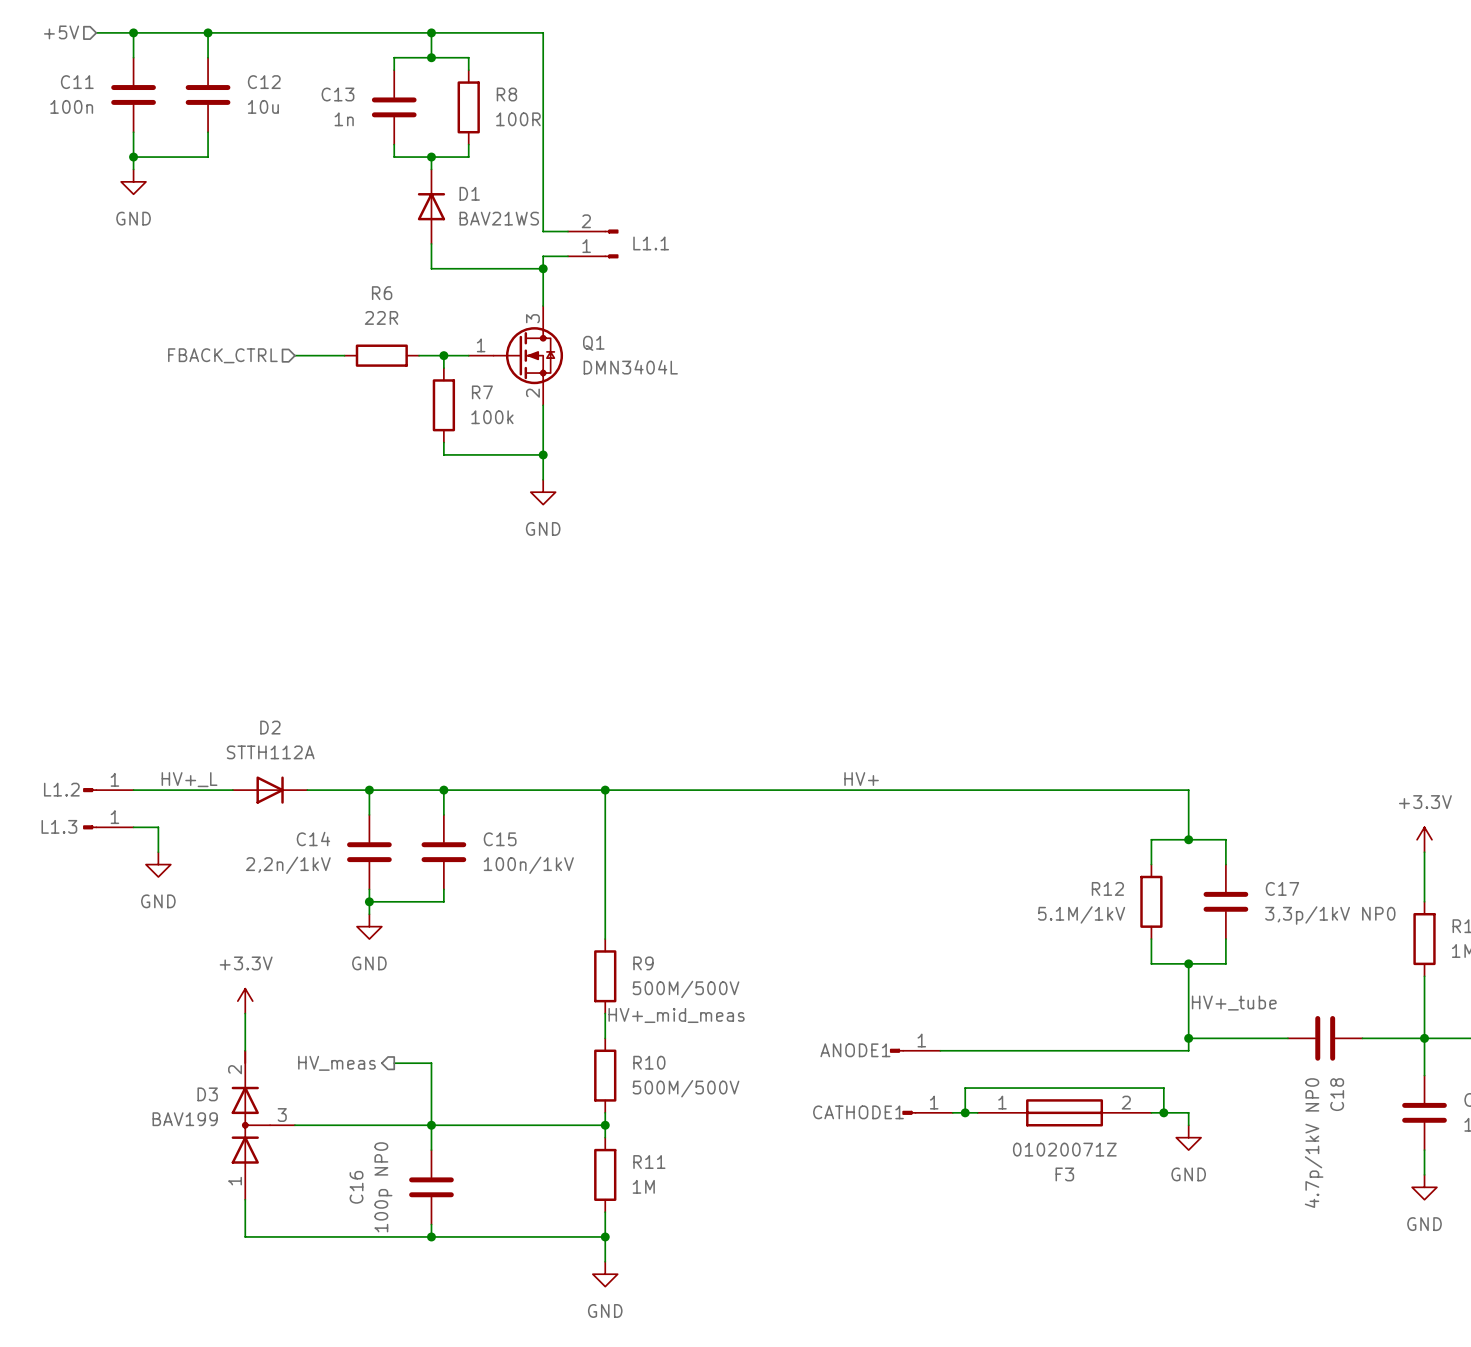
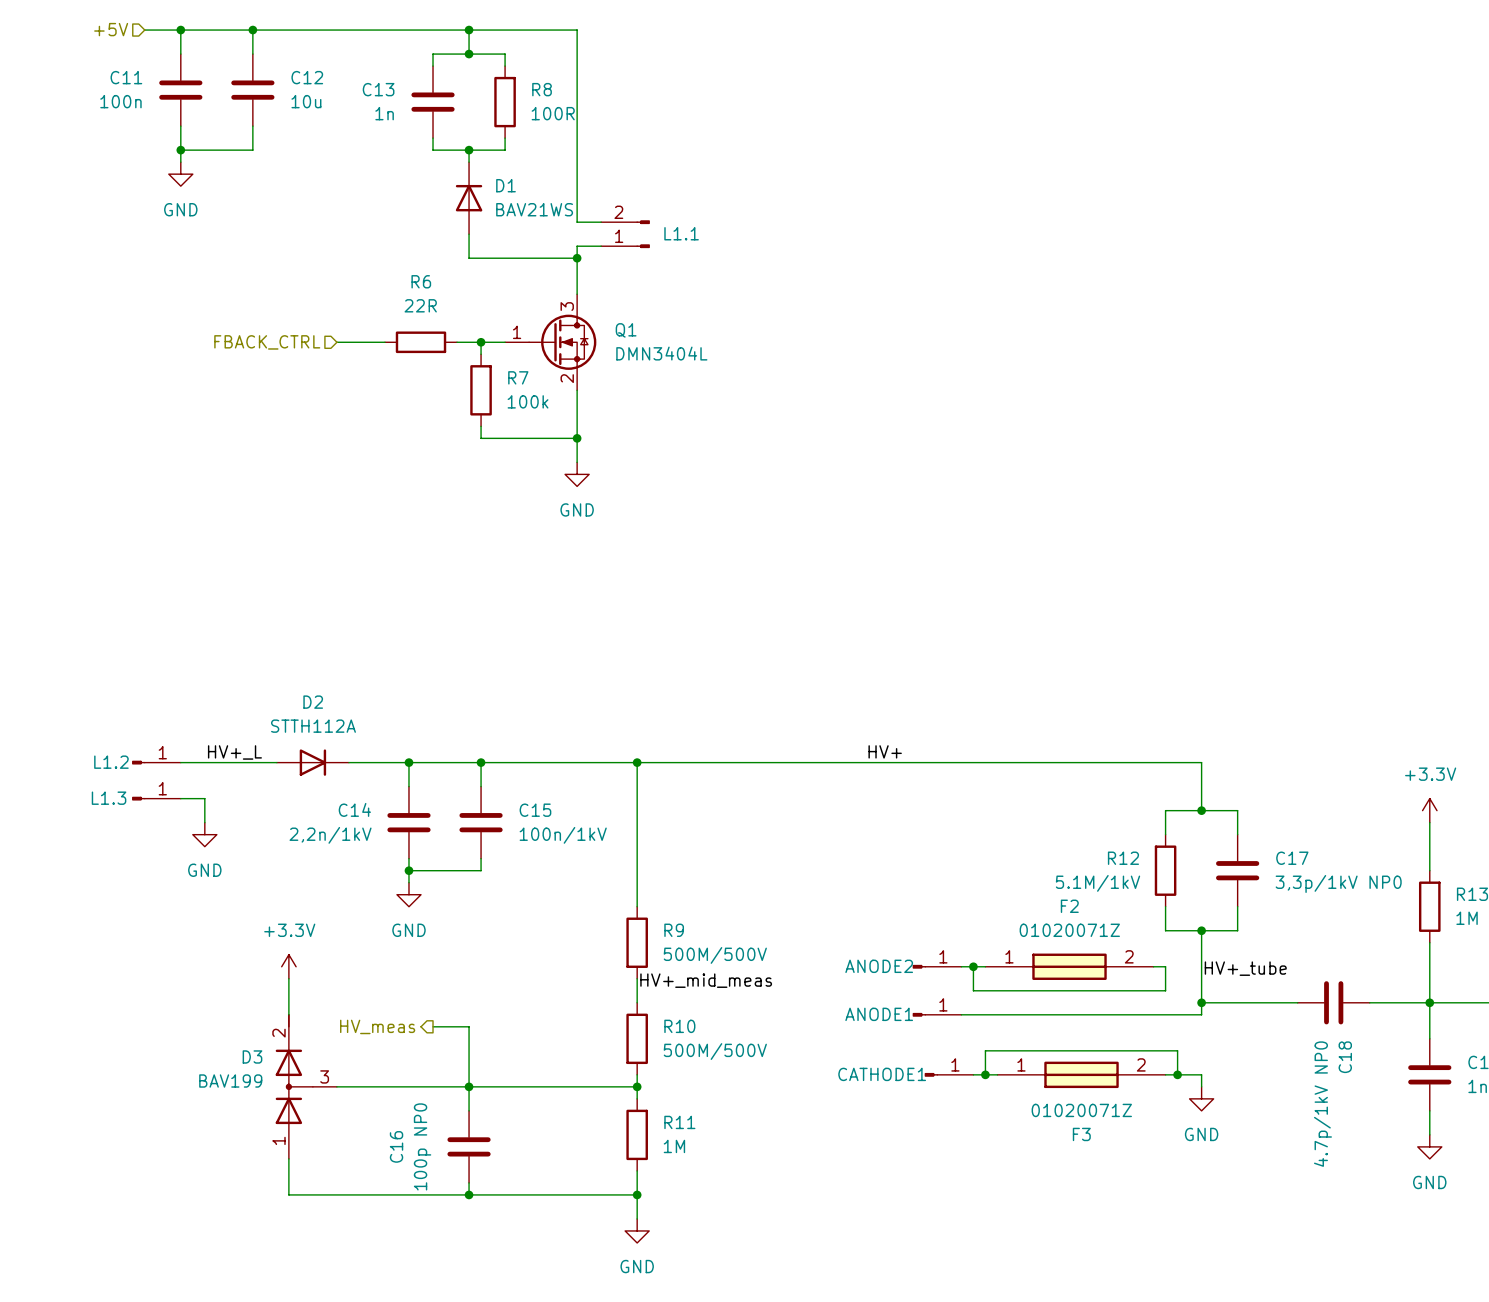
ANODE2: none -> (937, 966)
wire: none -> (961, 966) (985, 966)
wire: none -> (973, 966) (973, 990) (1165, 990) (1165, 966) (1153, 966)
junction: none -> (973, 966)
F2: none -> 01020071Z (1069, 966)

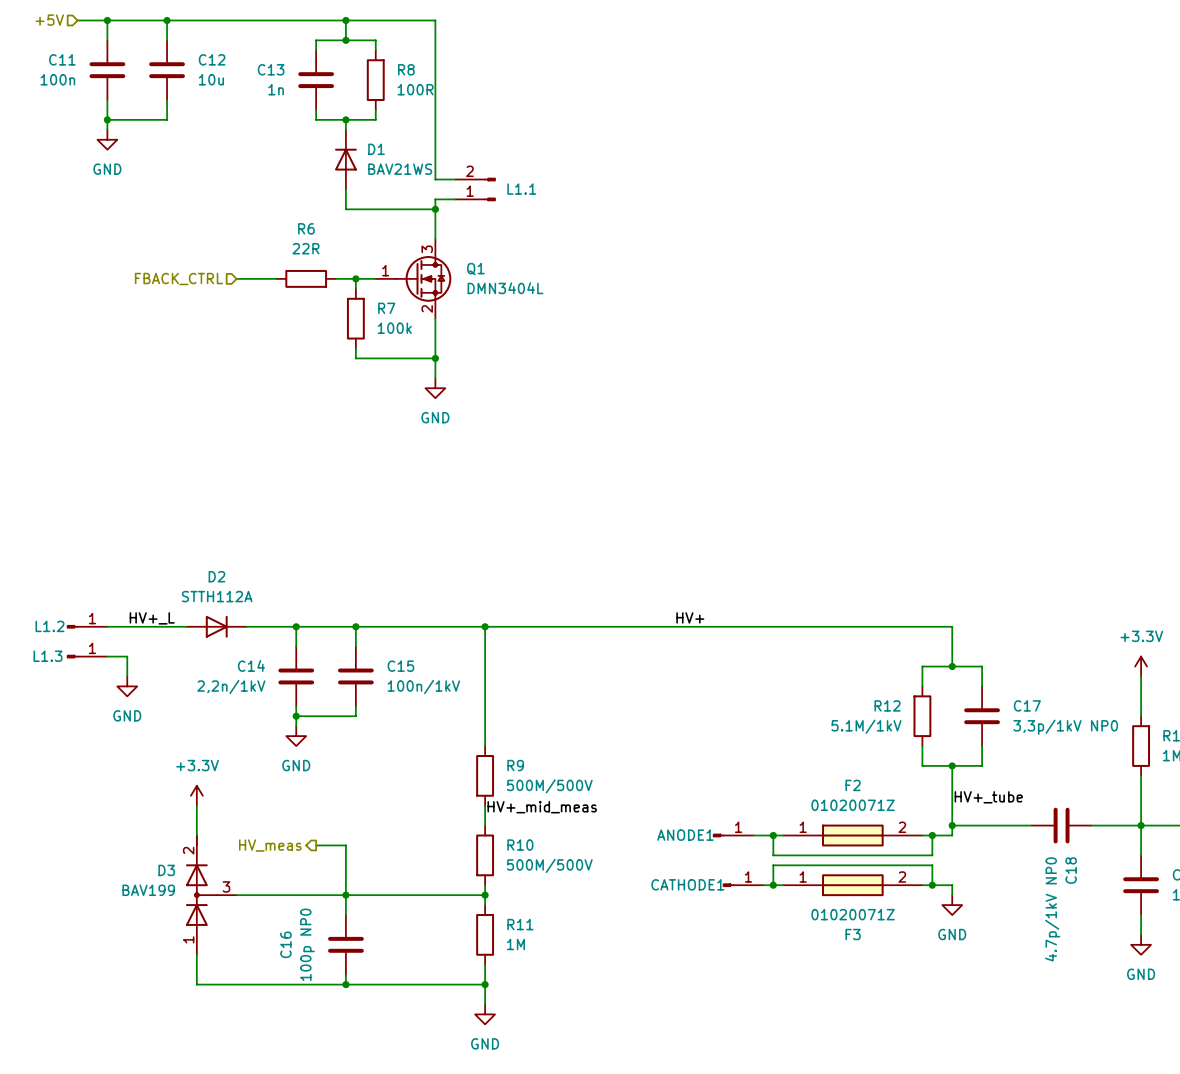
ANODE2: (937, 966) -> none
wire: (961, 966) (985, 966) -> none
wire: (973, 966) (973, 990) (1165, 990) (1165, 966) (1153, 966) -> none
junction position: (973, 966) -> (773, 835)
F2 position: (1069, 966) -> (852, 835)
wire: none -> (773, 835) (773, 855) (932, 855) (932, 835)
junction: none -> (932, 835)

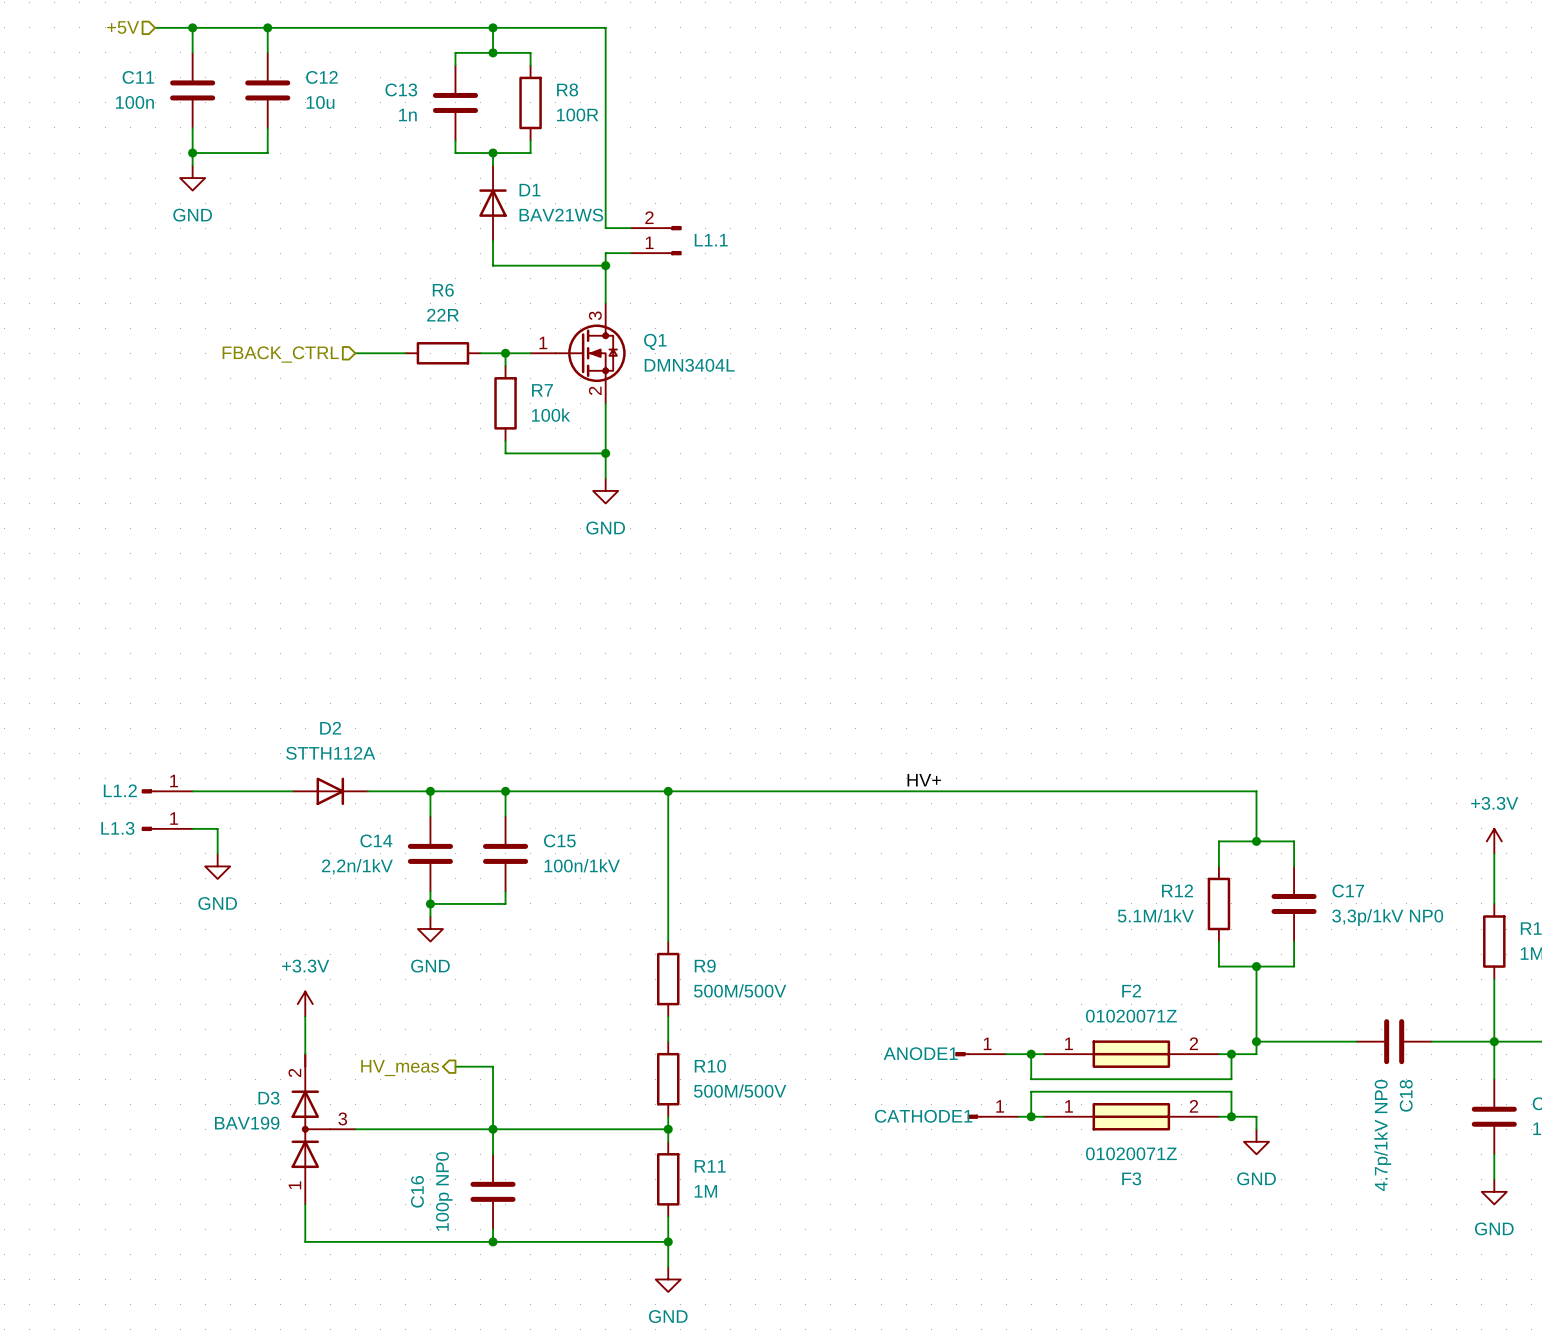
label: HV+_L (152, 618) -> none
label: HV+_tube (988, 797) -> none
label: HV+_mid_meas (542, 807) -> none

